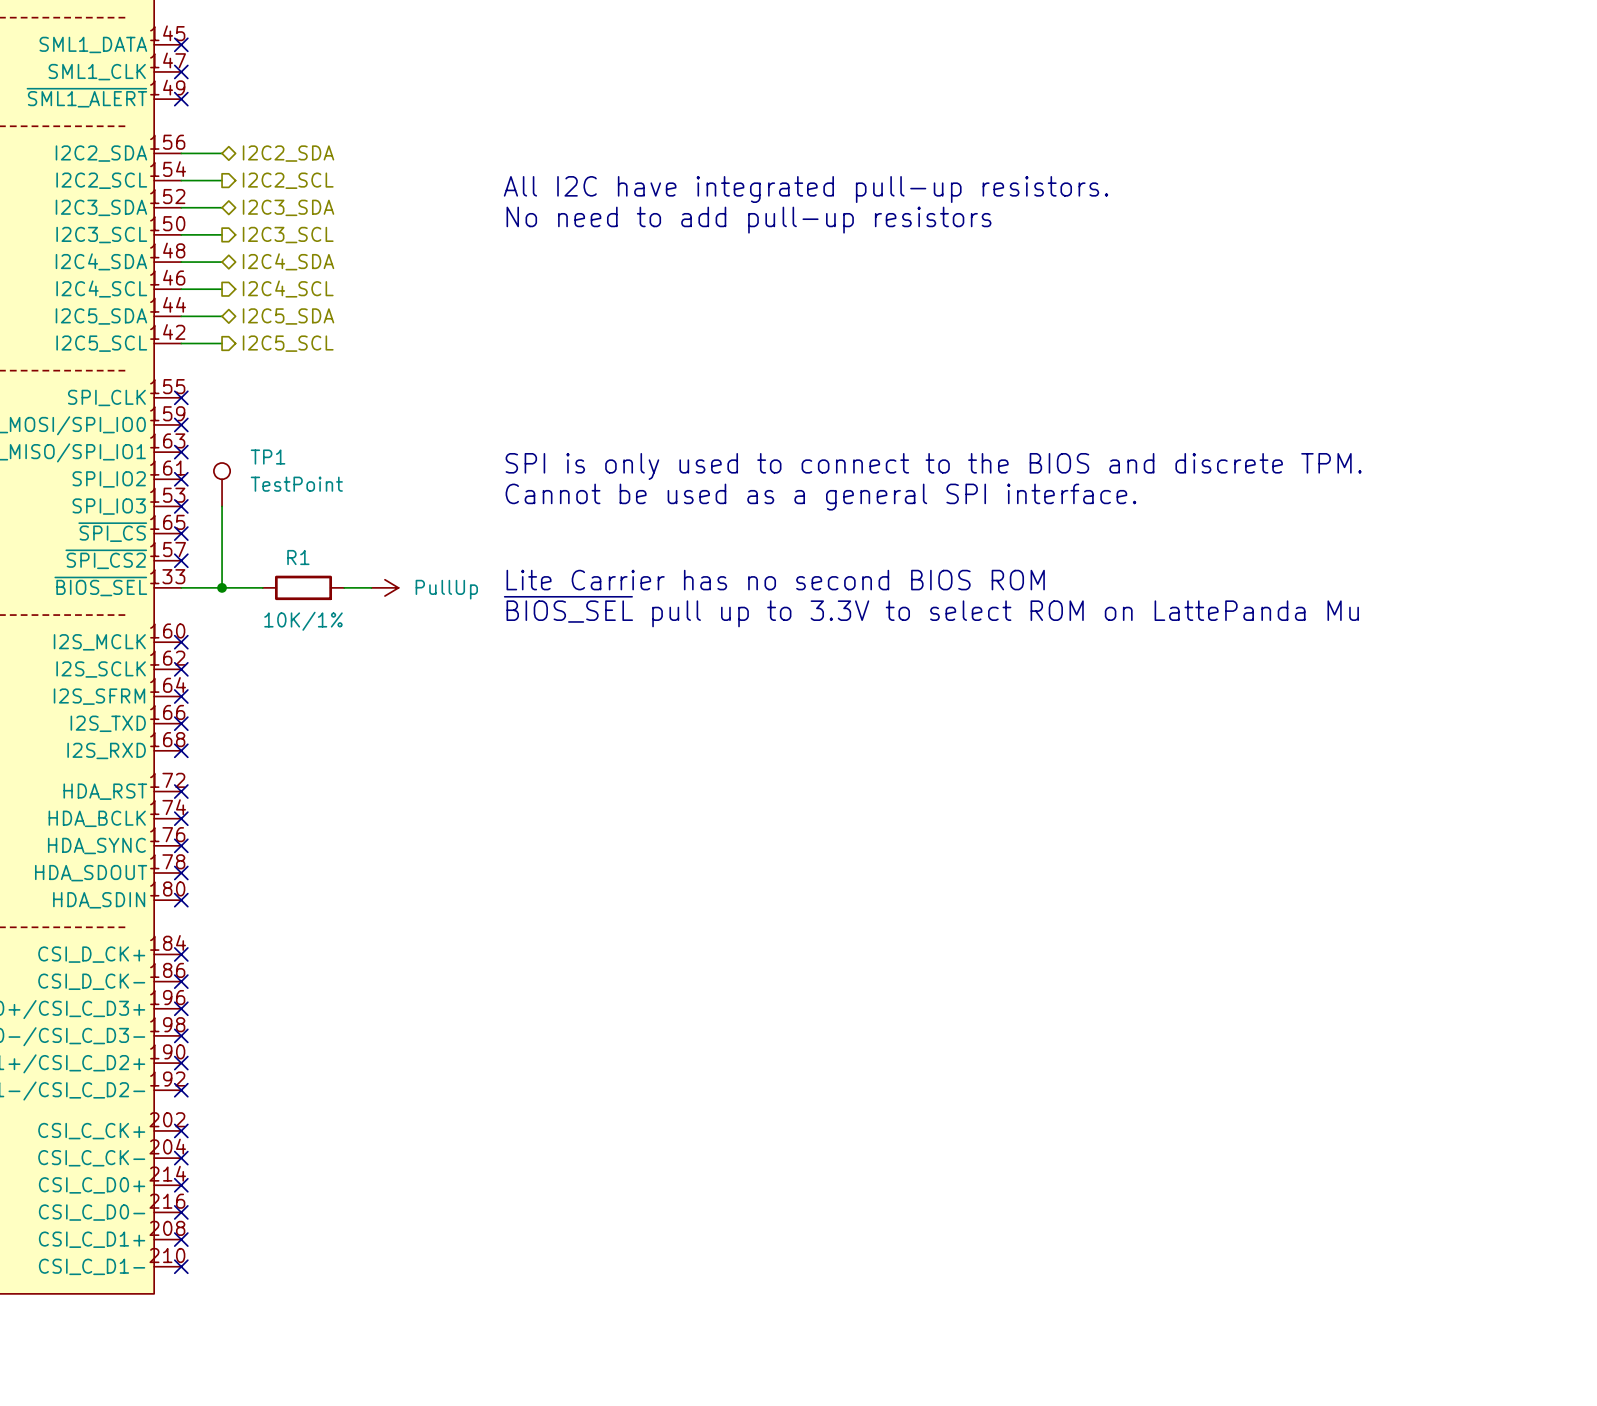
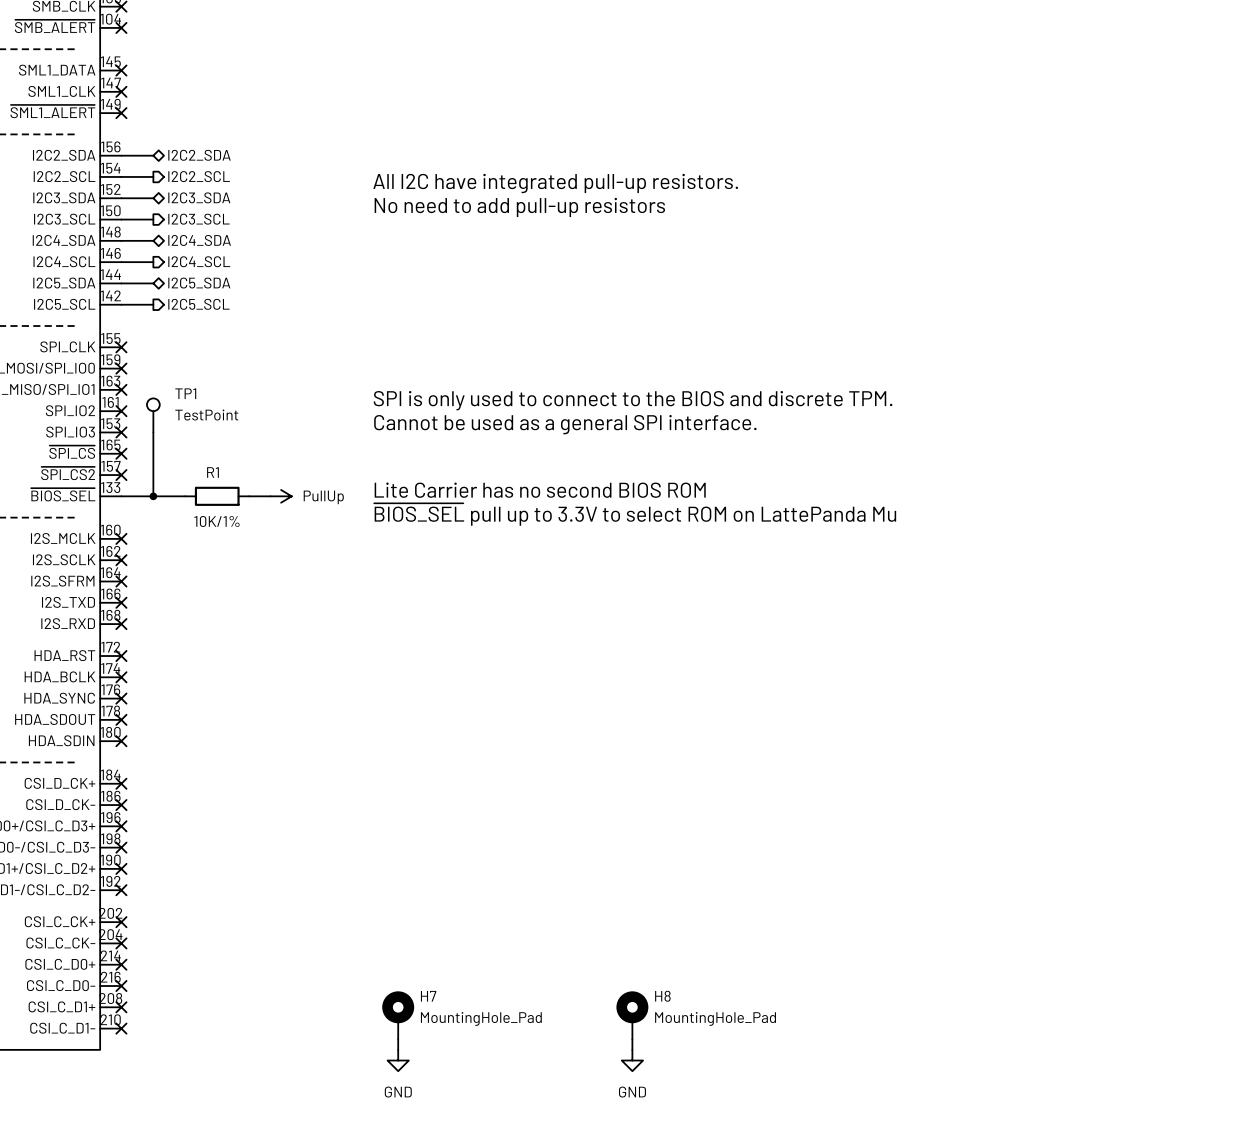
H7: none -> MountingHole_Pad (398, 1015)
H8: none -> MountingHole_Pad (632, 1015)
wire: none -> (398, 1039) (398, 1049)
wire: none -> (632, 1039) (632, 1049)
power symbol: none -> GND (398, 1060)
power symbol: none -> GND (632, 1060)

